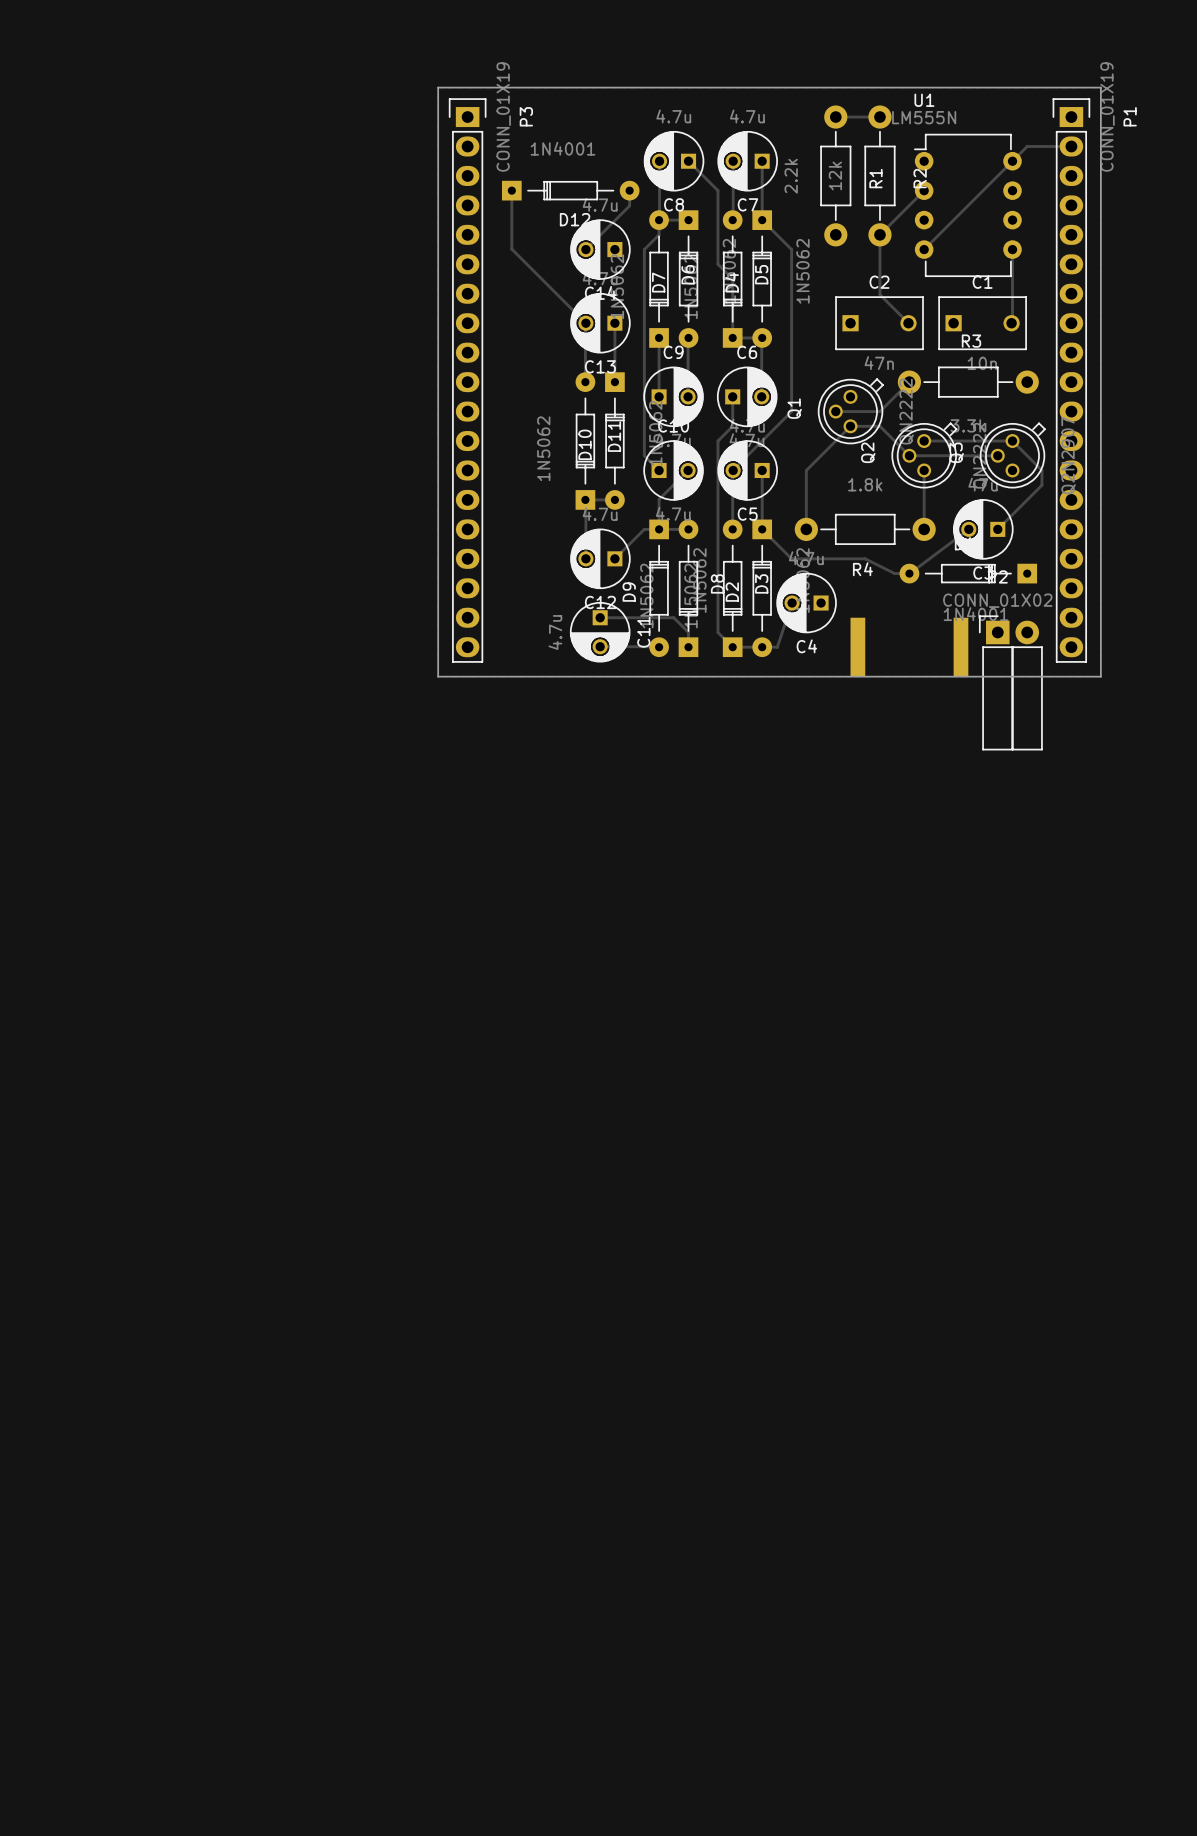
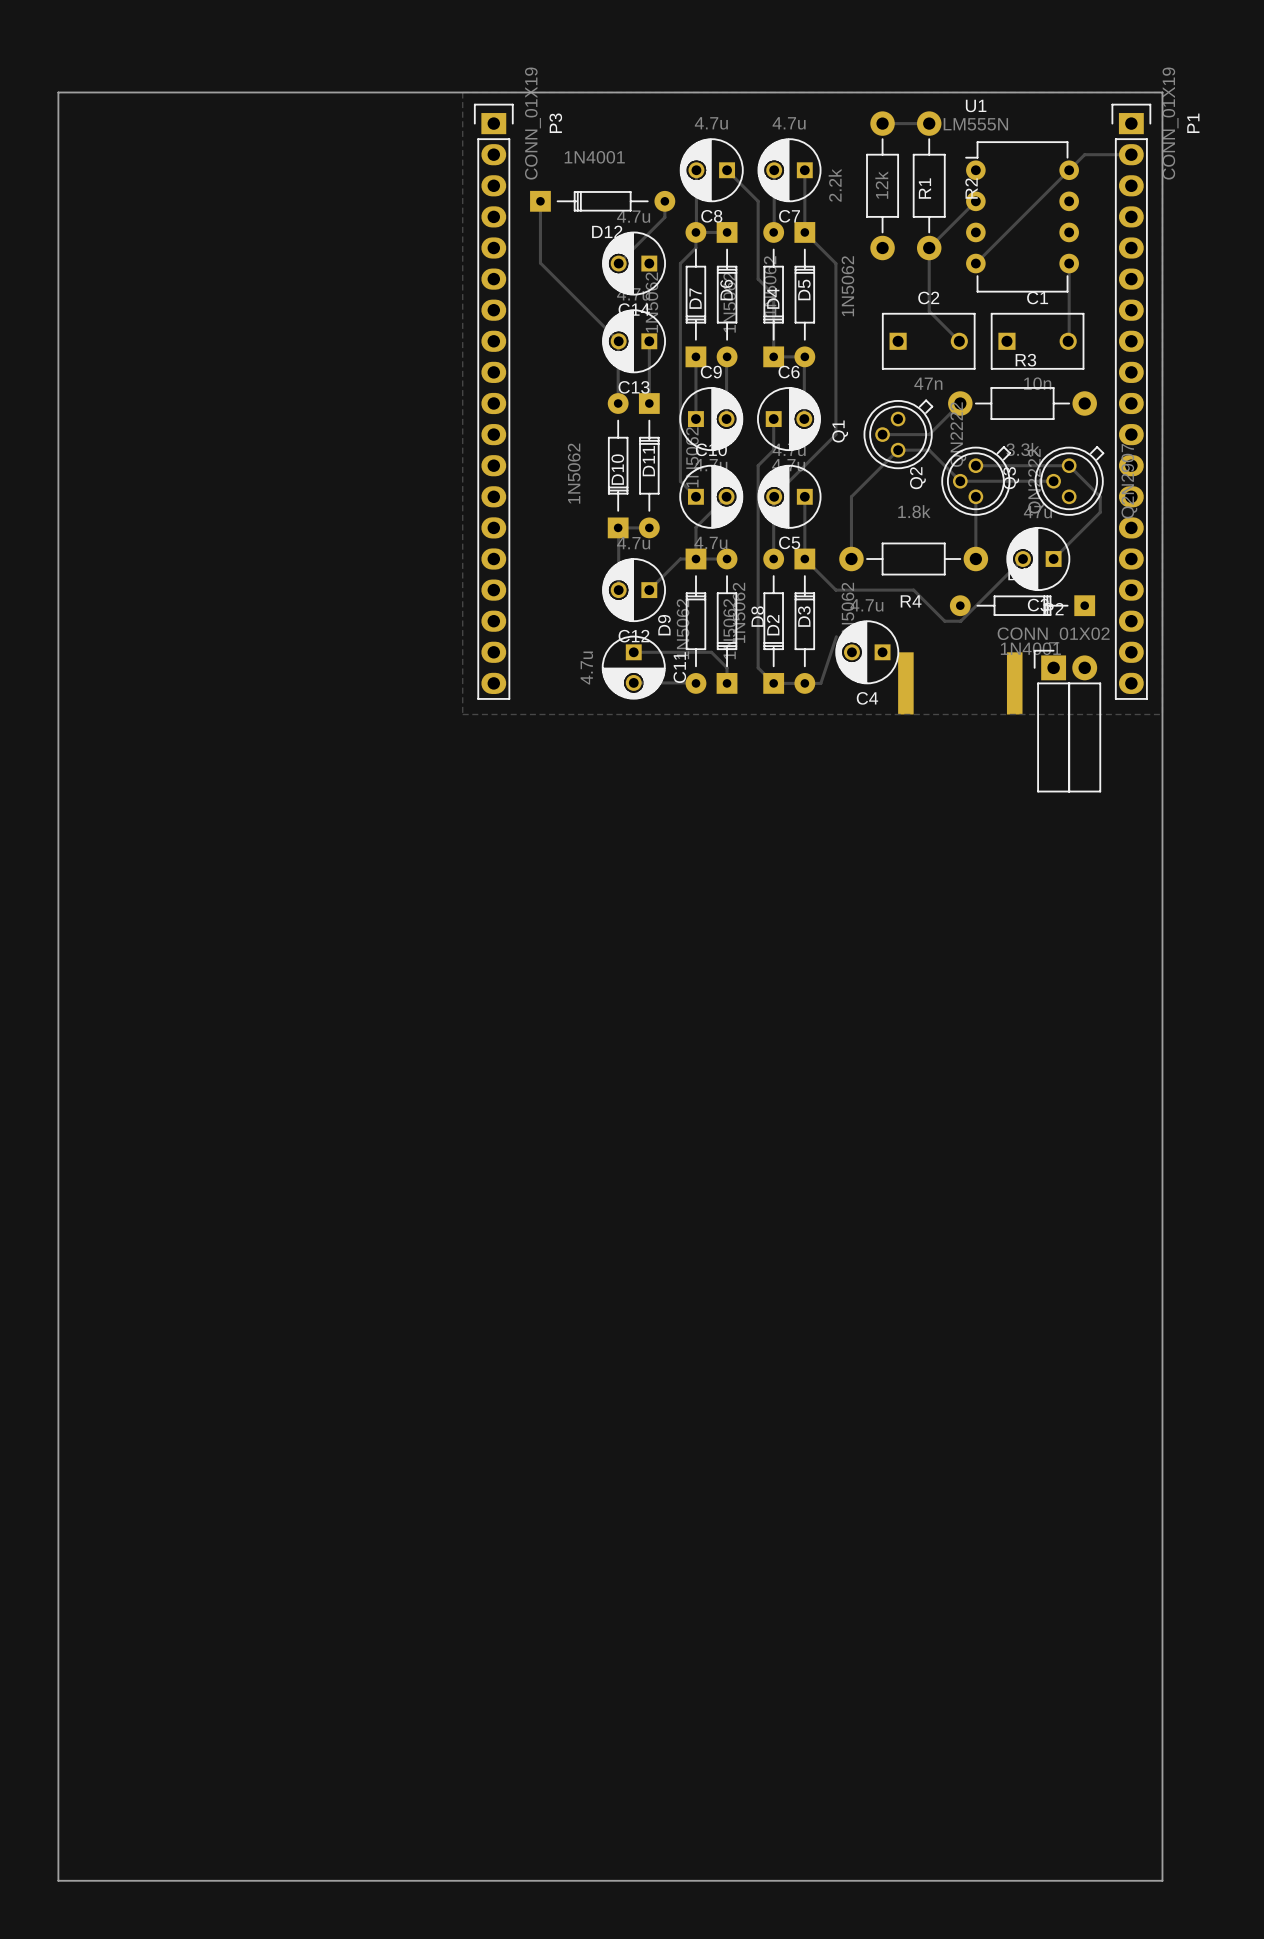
board edge: (438, 87) (438, 676) (1100, 676) -> (462, 92) (58, 92) (58, 1880) (1162, 1880) (1162, 714)
track: (968, 529) (909, 573) (894, 573) (865, 558) -> (1023, 559) (960, 621) (944, 621) (913, 590)
C4 position: (806, 603) -> (867, 652)

